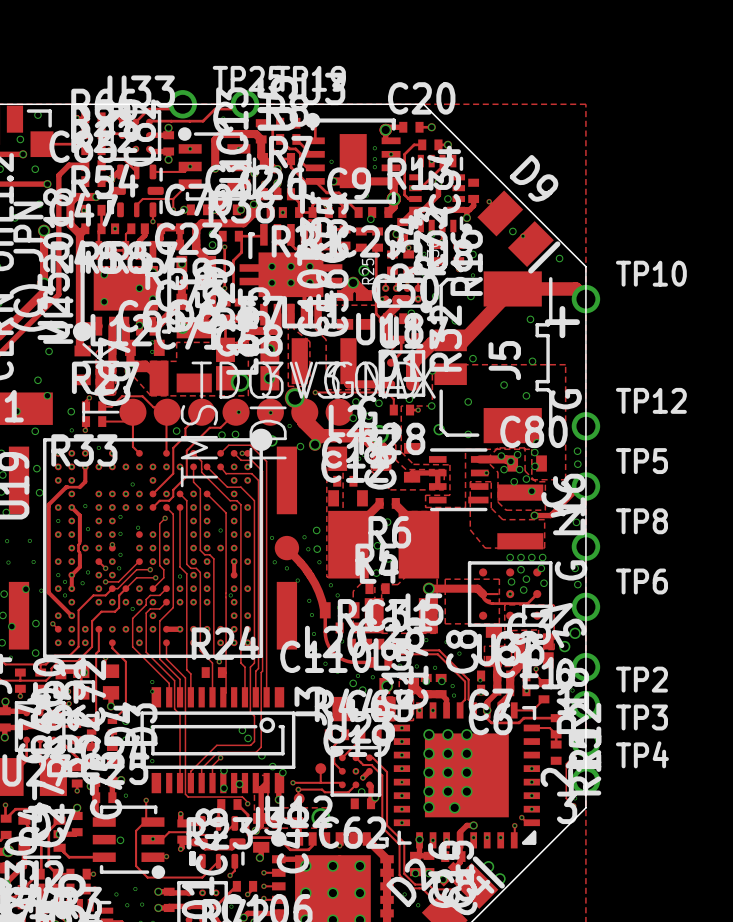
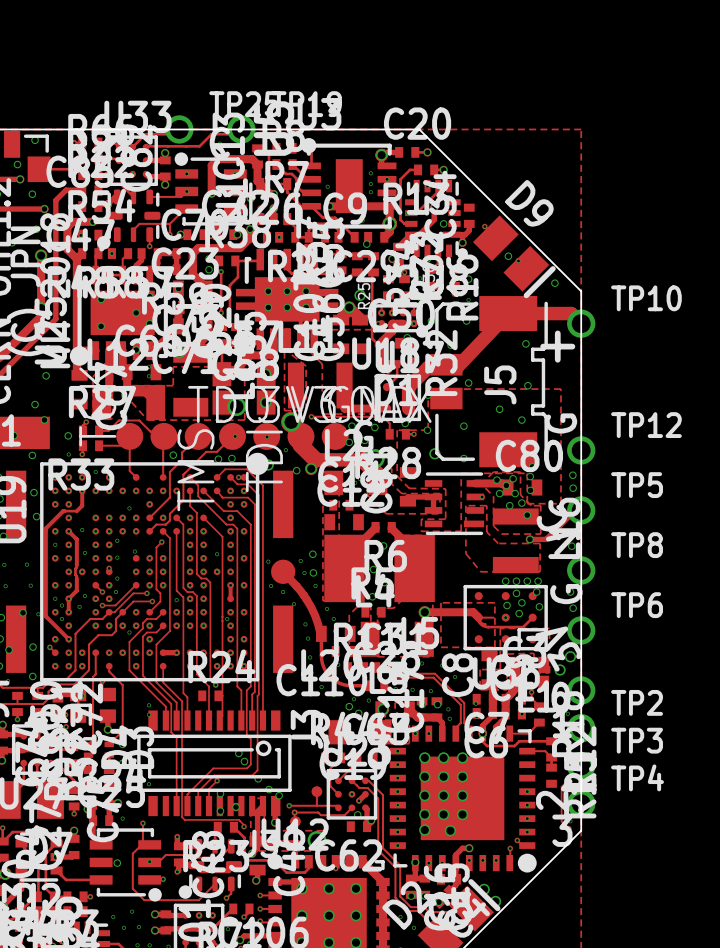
part footprint: [107, 164, 164, 218] -> [97, 189, 161, 250]
part footprint: [393, 702, 540, 849] -> [389, 725, 537, 873]
part footprint: [189, 815, 246, 869] -> [178, 838, 243, 899]

